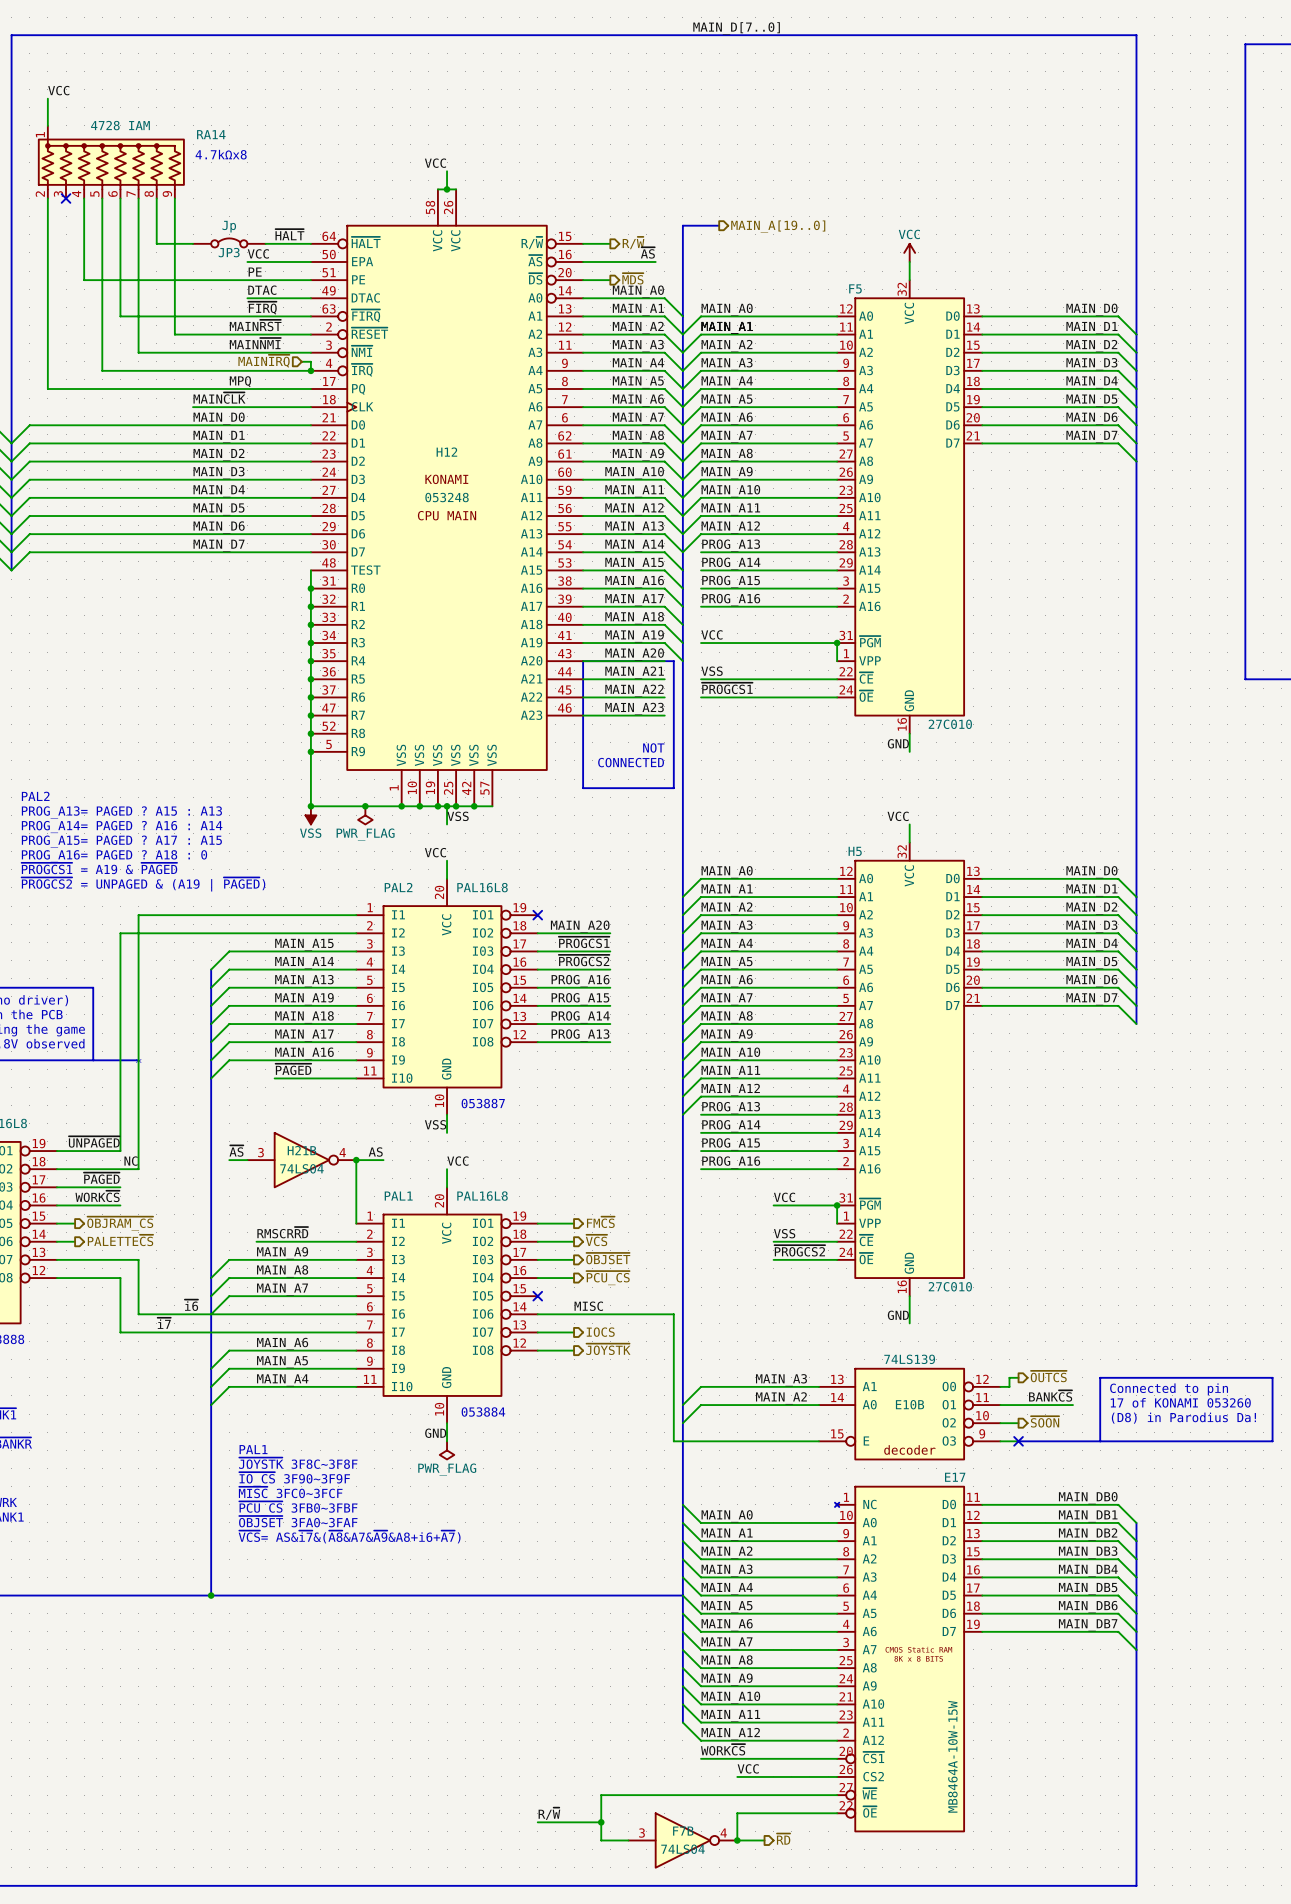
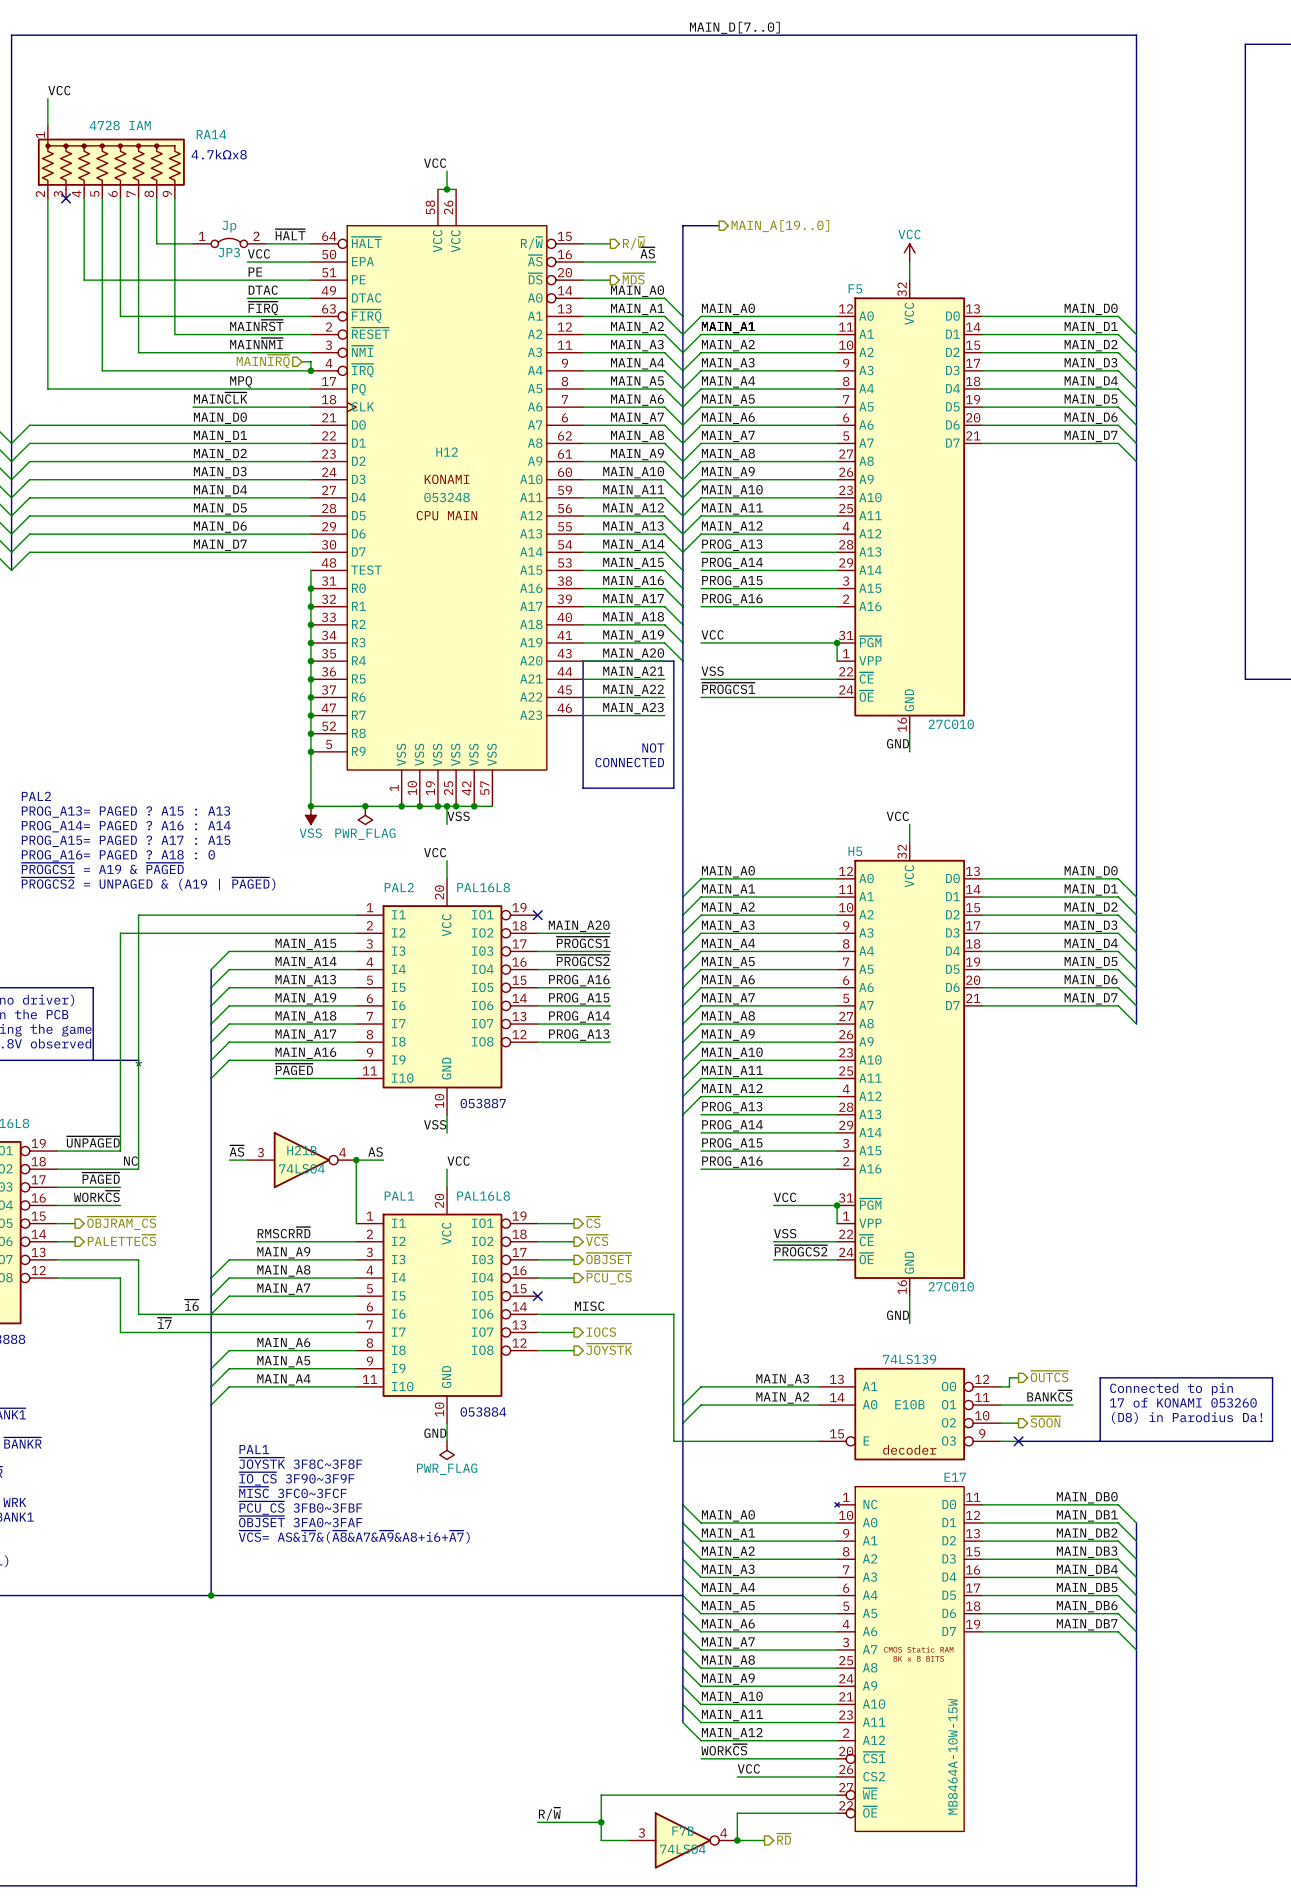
JP3 pin number: none -> 1 (202, 236)
JP3 pin number: none -> 2 (256, 236)
hierarchical label: FM~{CS} (600, 1222) -> ~{CS} (593, 1222)

